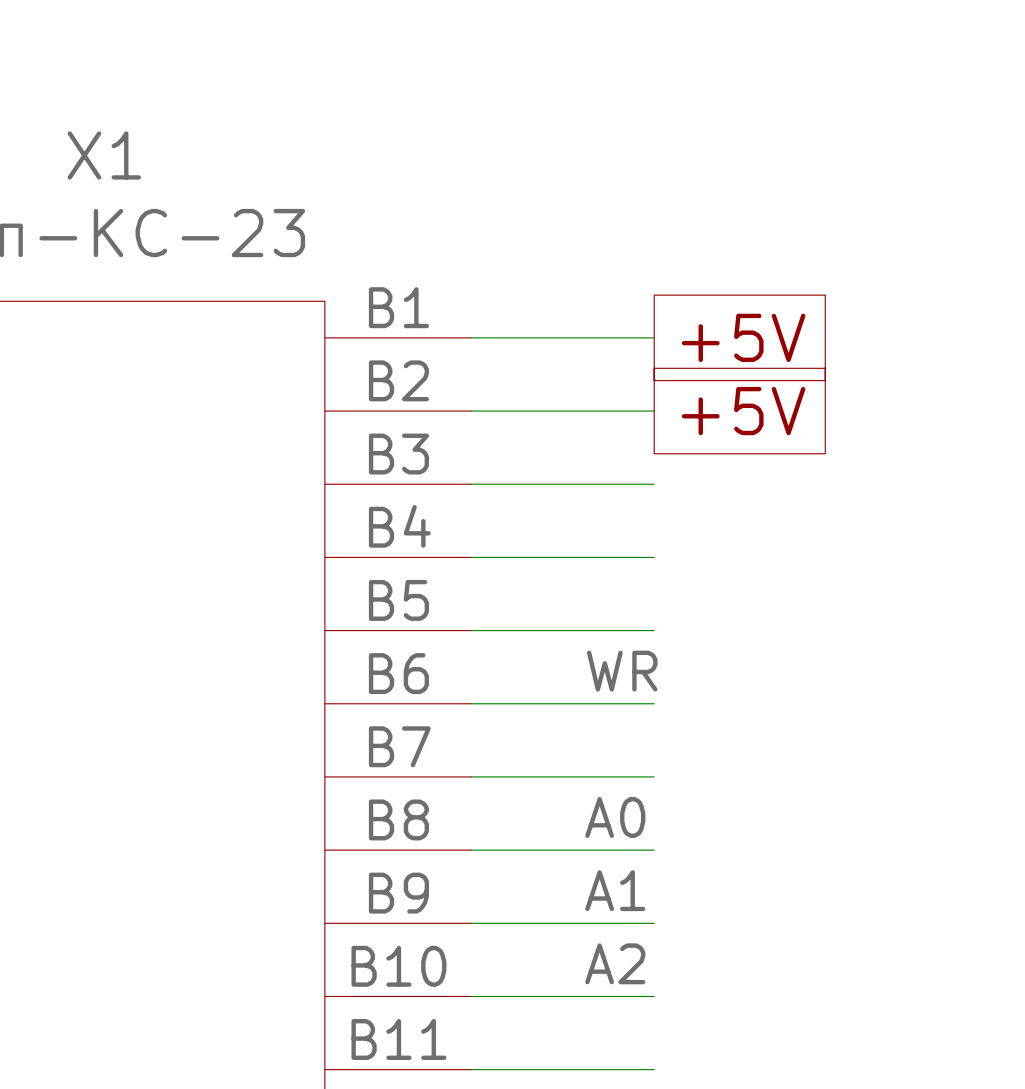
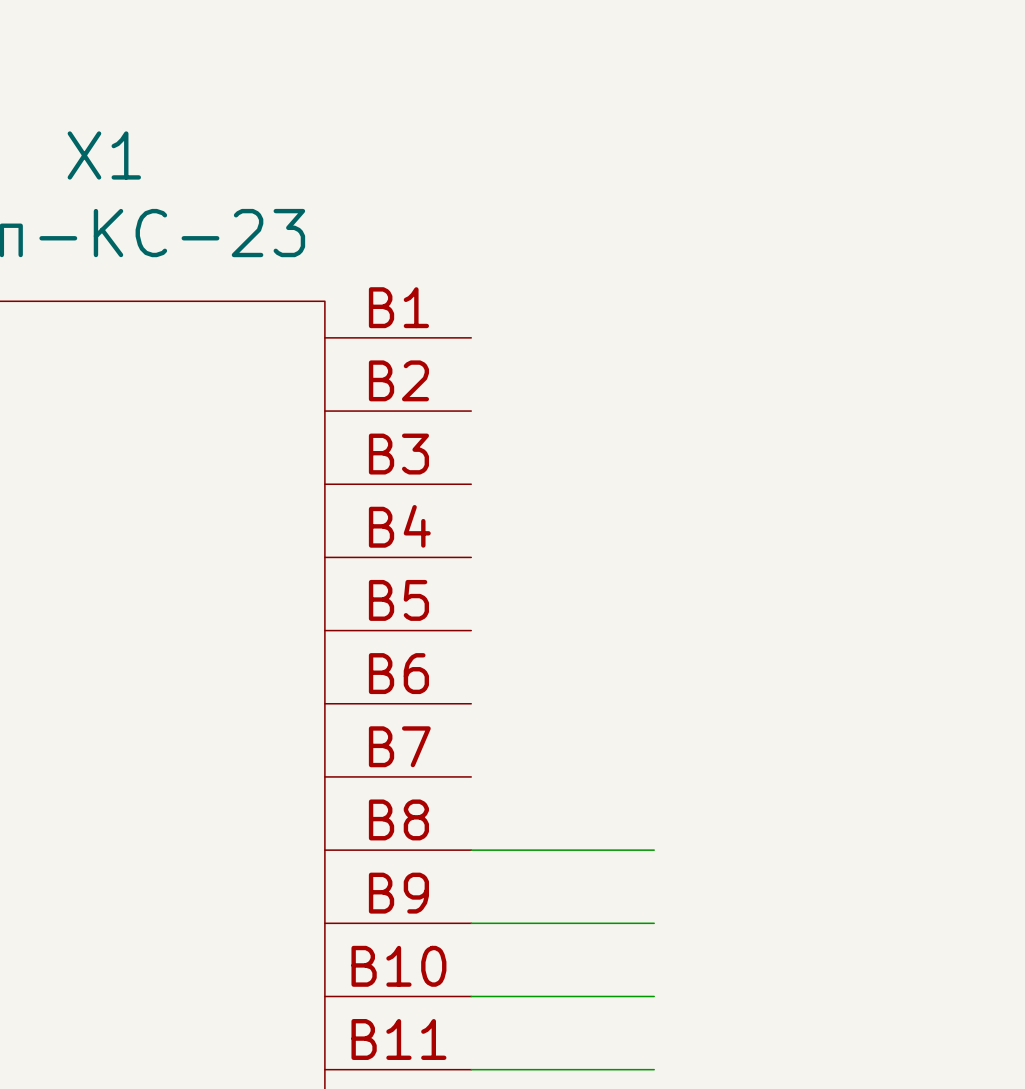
wire: (471, 337) (654, 337) -> none
global label: +5V (743, 337) -> none
wire: (471, 411) (654, 411) -> none
global label: +5V (743, 411) -> none
wire: (471, 484) (654, 484) -> none
wire: (471, 557) (654, 557) -> none
wire: (471, 630) (654, 630) -> none
label: WR (622, 671) -> none
wire: (471, 703) (654, 703) -> none
wire: (471, 776) (654, 776) -> none
label: A0 (615, 817) -> none
label: A1 (615, 890) -> none
label: A2 (615, 963) -> none

